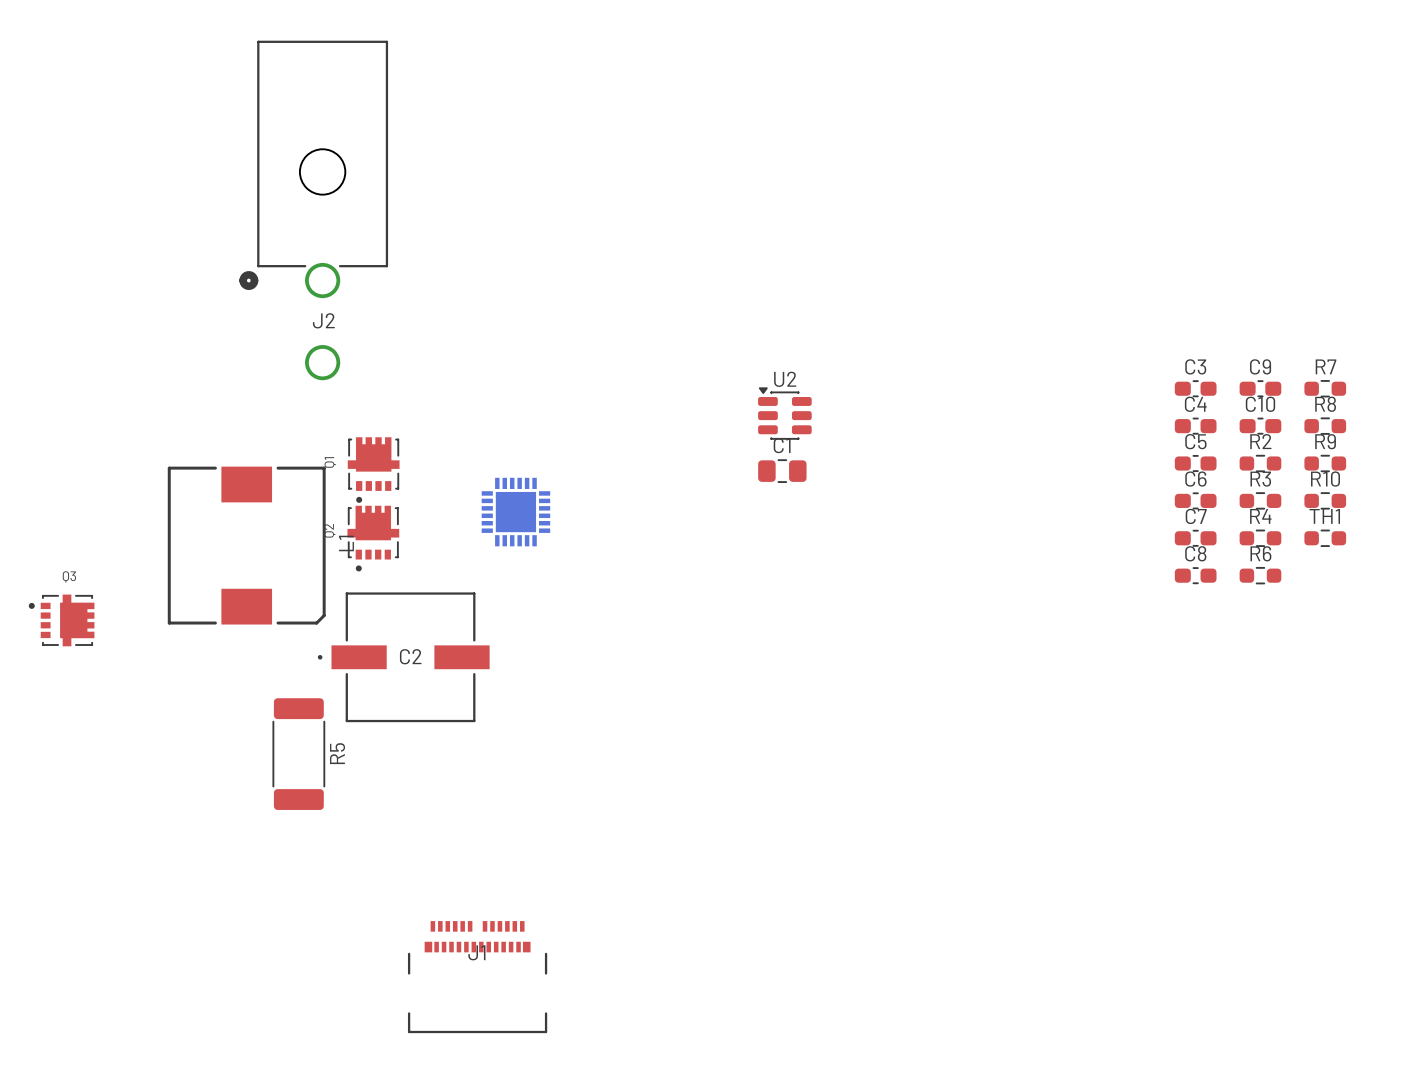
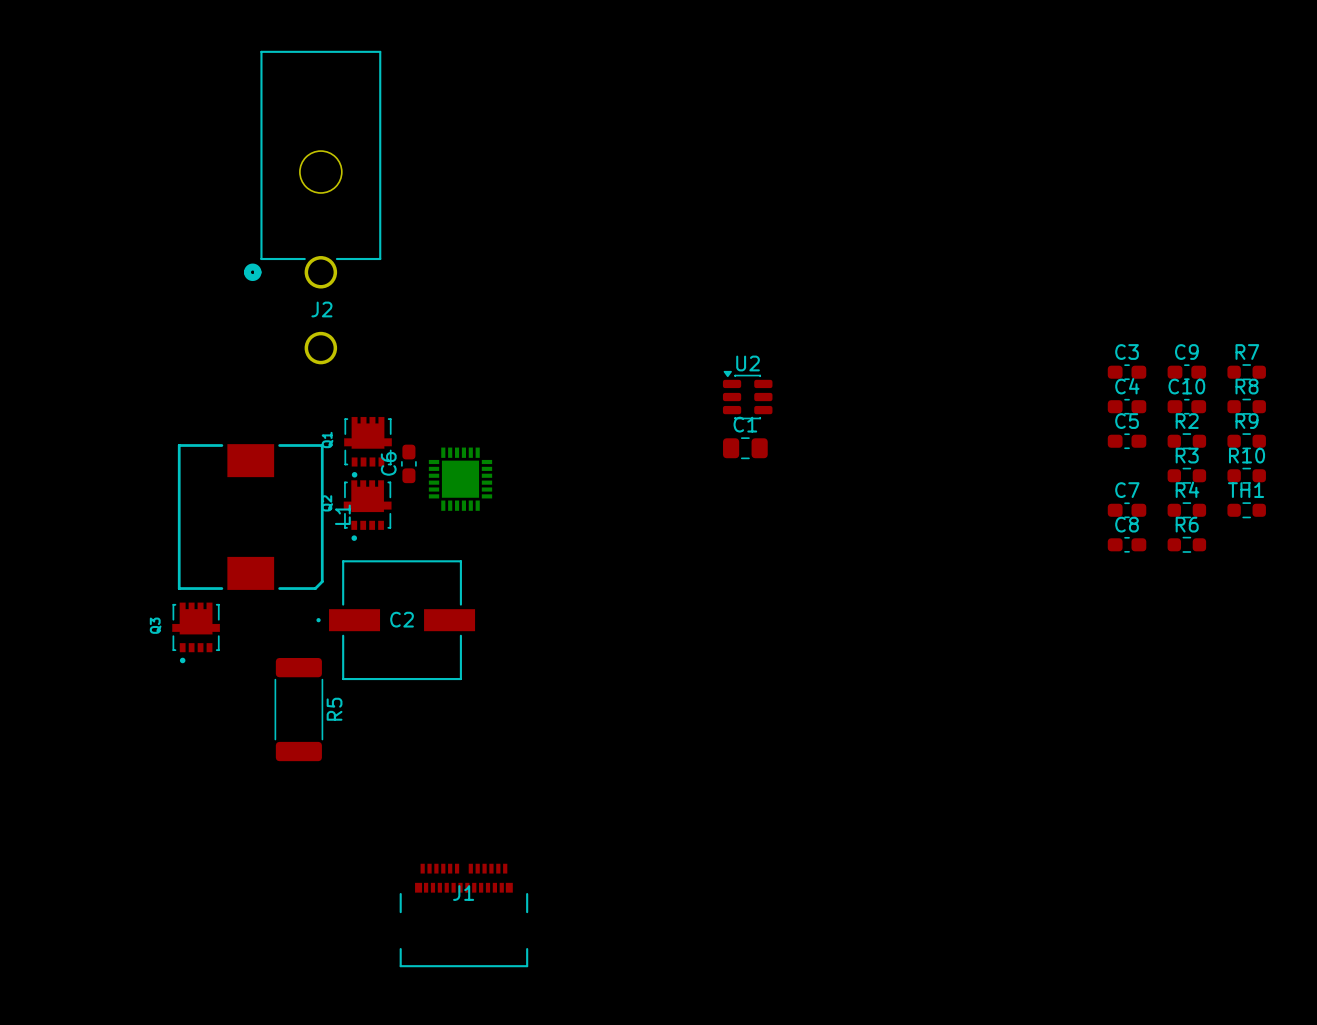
C6 name position: C6 (1195, 479) -> C6 (388, 463)
C6 rotation: 0° (1195, 500) -> 90° clockwise (408, 463)
C6 position: (1195, 500) -> (408, 463)
part position: (515, 512) -> (460, 479)
Q3 rotation: 0° (61, 620) -> 90° counterclockwise (196, 632)
Q3 position: (61, 620) -> (196, 632)

